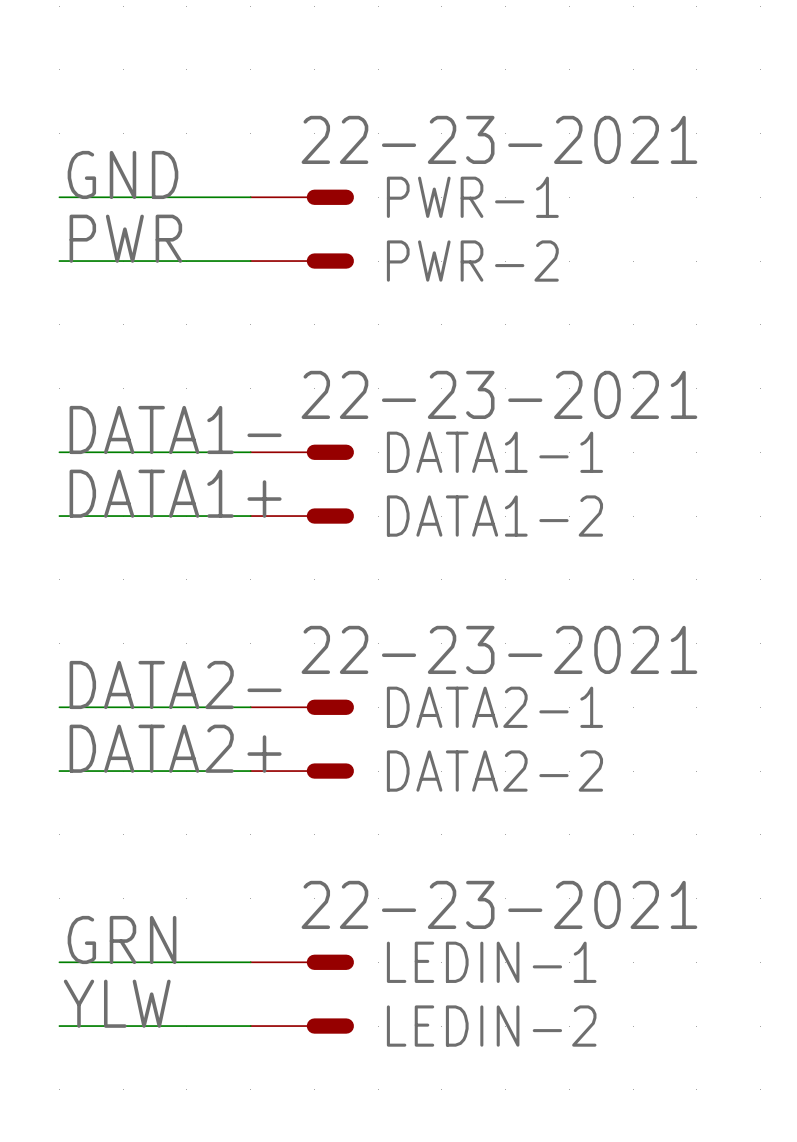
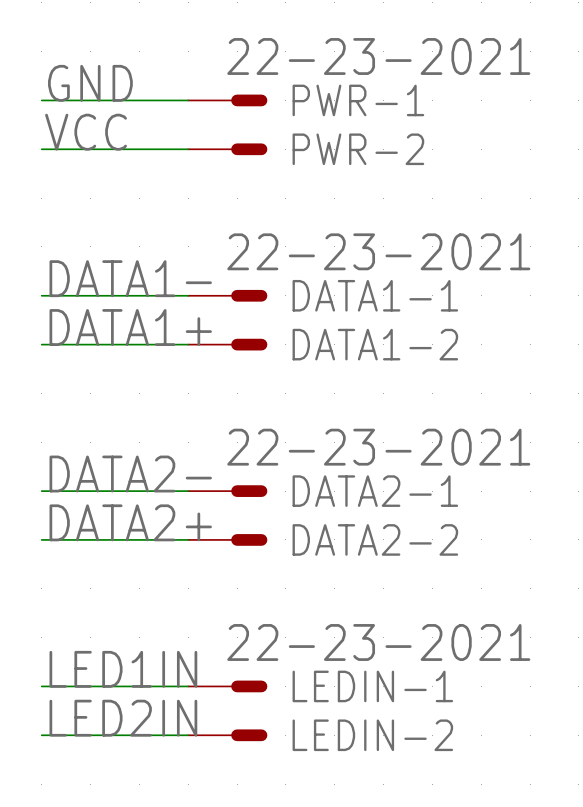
label: PWR (125, 238) -> VCC (86, 132)
label: GRN (122, 939) -> LED1IN (123, 669)
label: YLW (117, 1003) -> LED2IN (123, 718)

